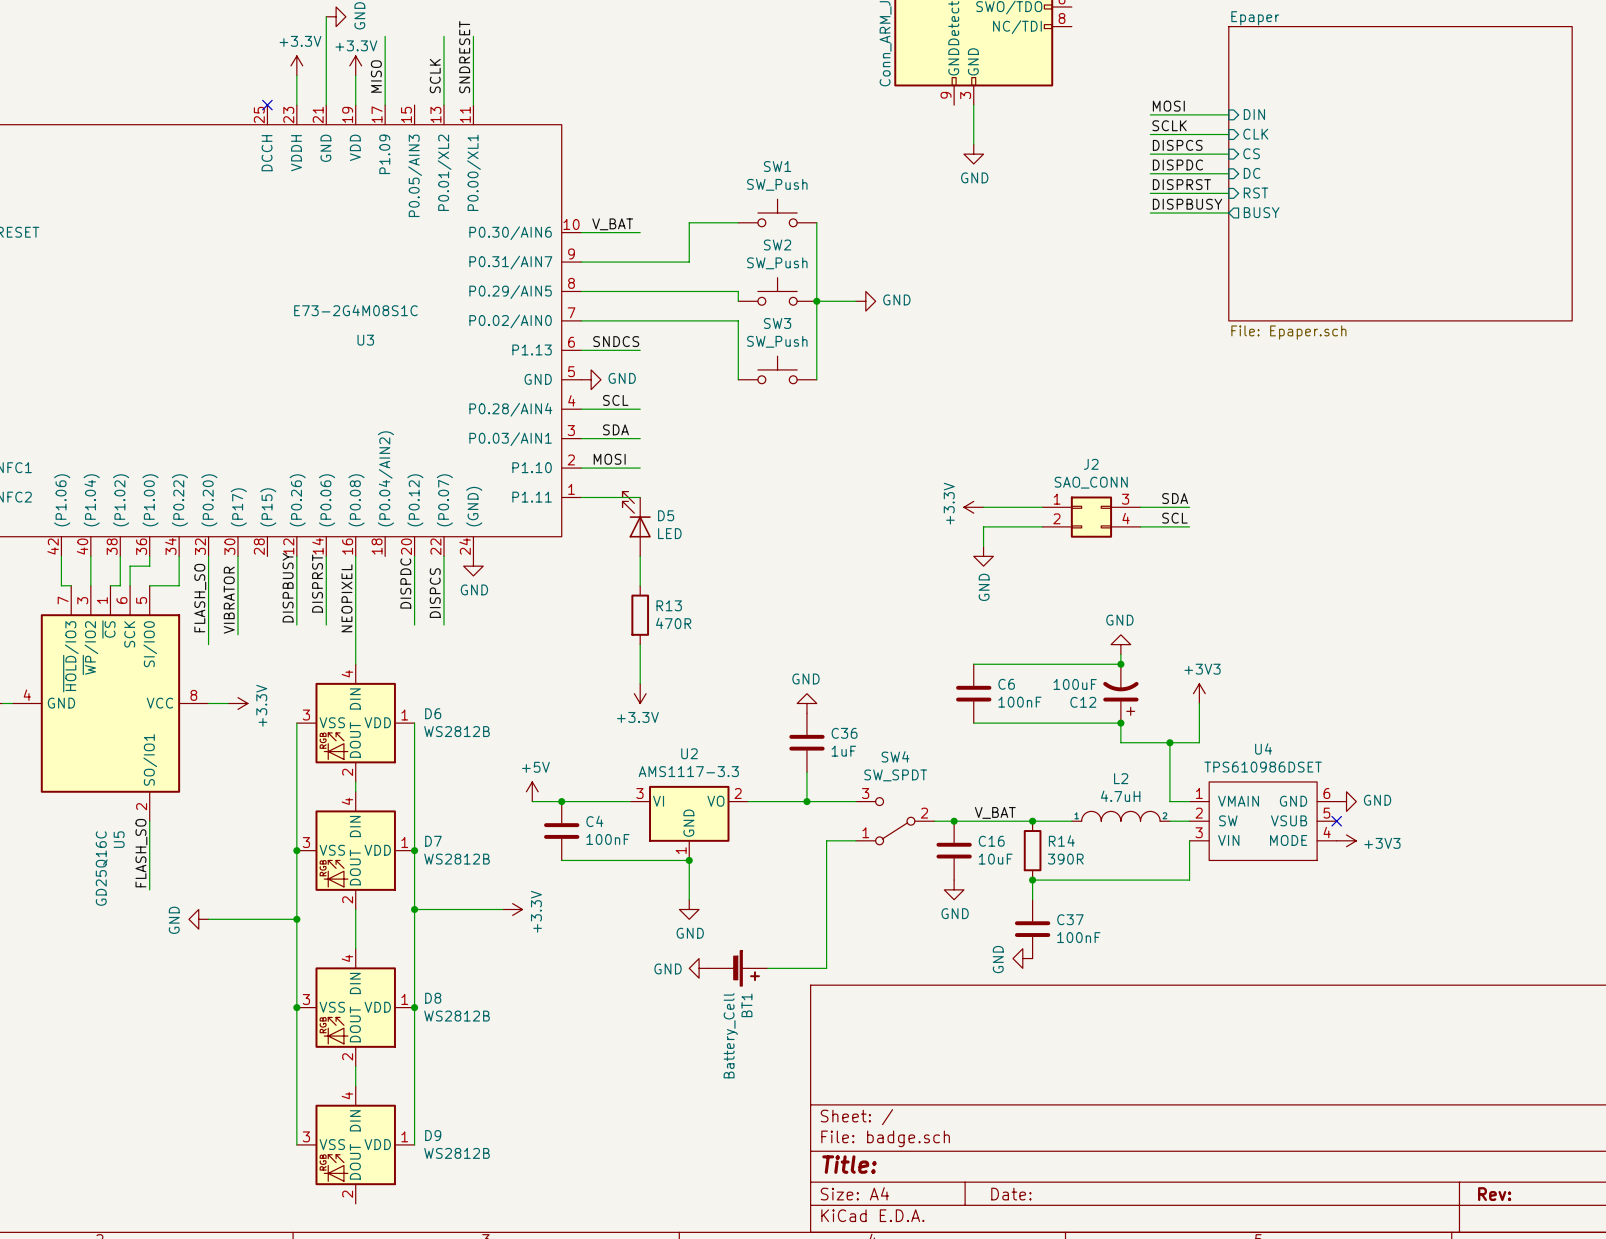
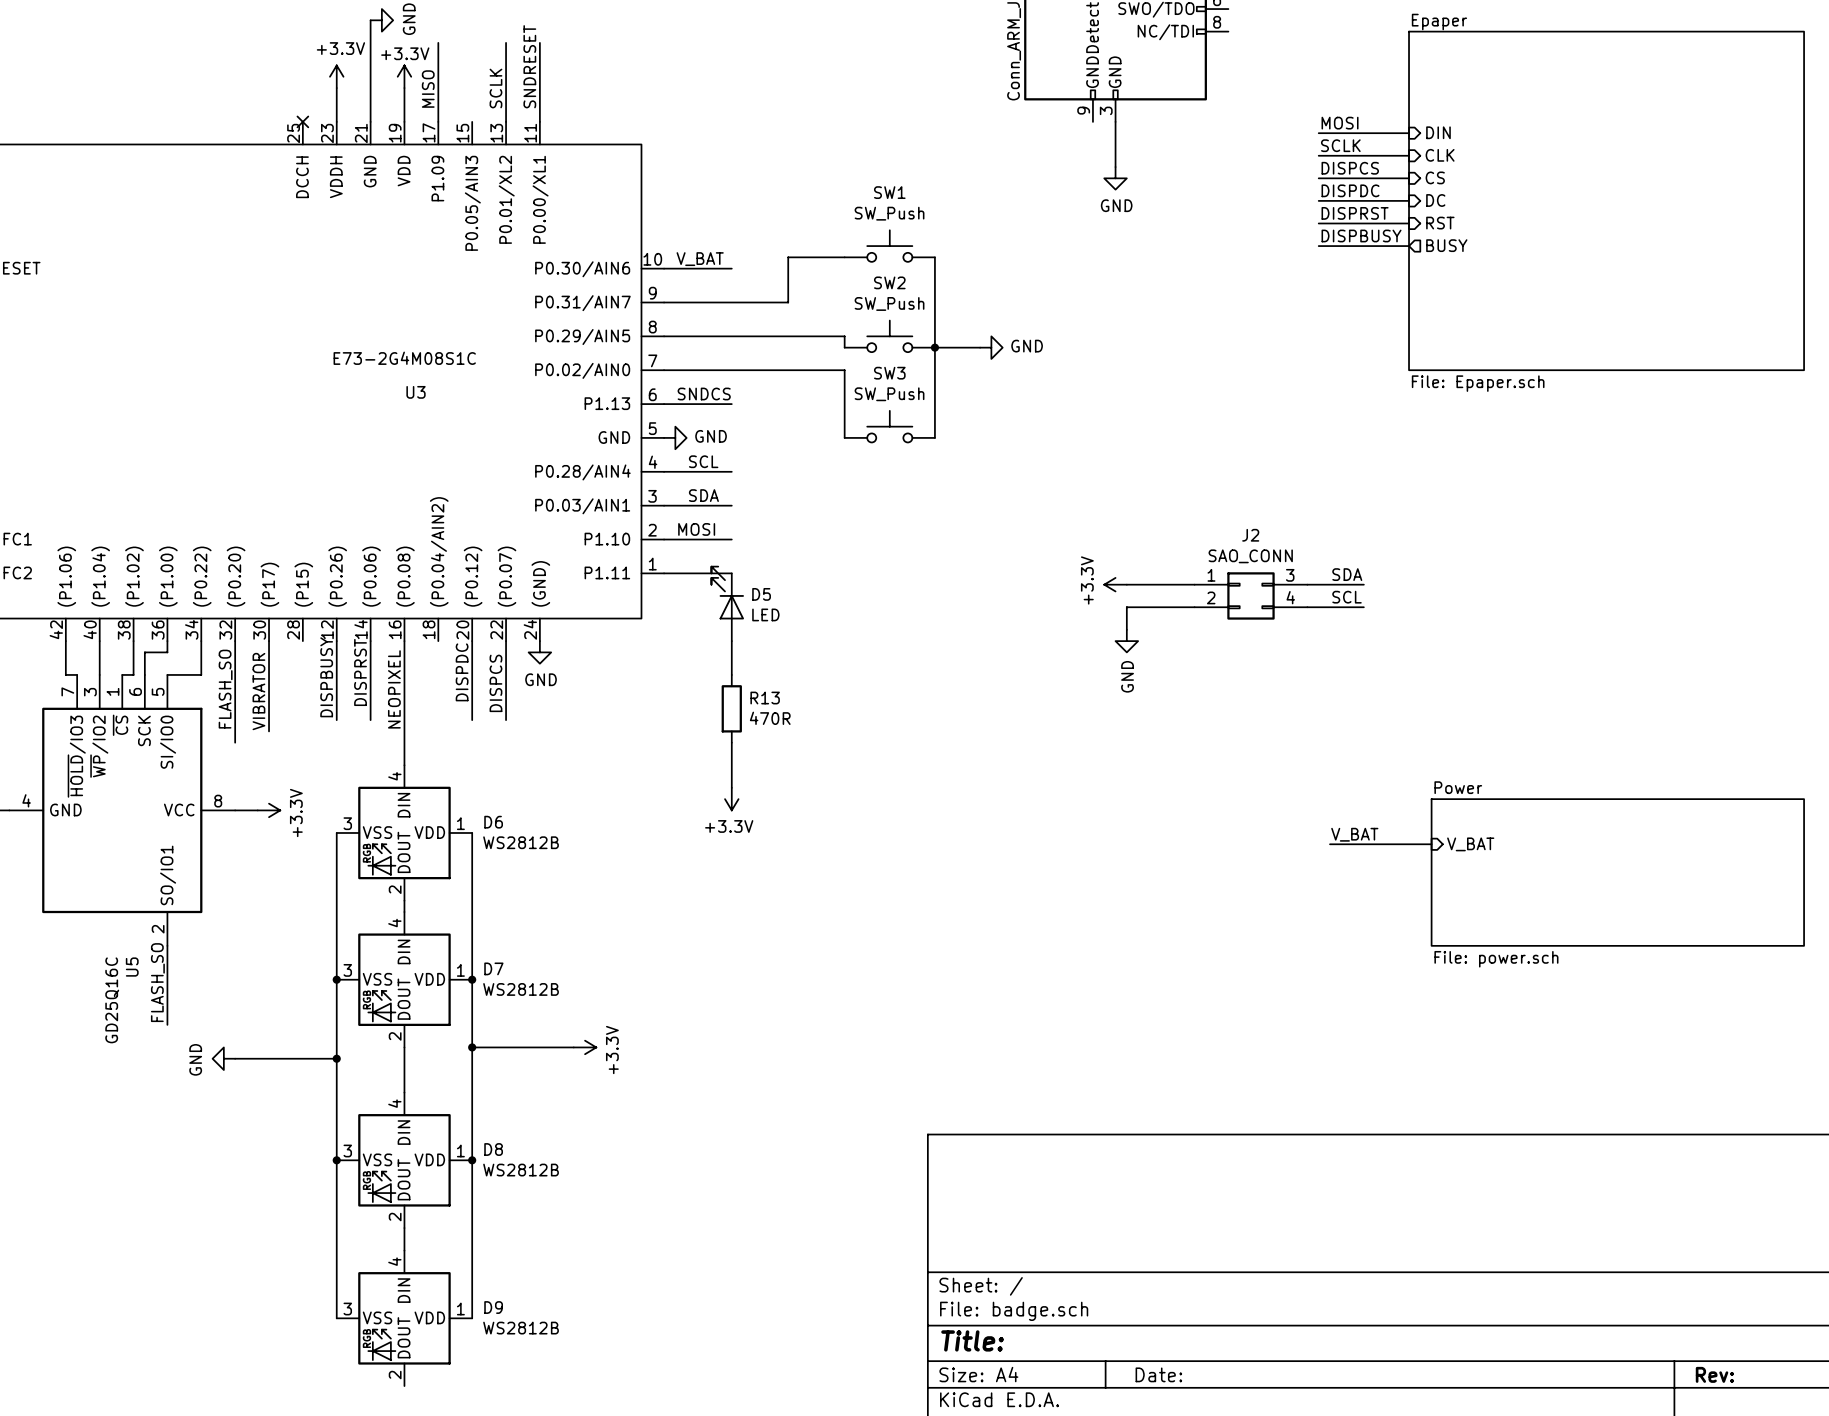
power symbol: GND (1120, 644) -> none
wire: (1120, 654) (1120, 664) (973, 664) -> none
junction: (1120, 664) -> none
C6: 100nF (973, 693) -> none
C12: 100uF (1120, 693) -> none
power symbol: +3V3 (1199, 693) -> none
power symbol: GND (806, 703) -> none
wire: (1199, 703) (1199, 742) (1120, 742) (1120, 723) (973, 723) -> none
junction: (1120, 723) -> none
label: none -> V_BAT (1354, 834)
wire: none -> (1330, 844) (1431, 844)
sheet pin: none -> V_BAT (1470, 844)
C36: 1uF (806, 742) -> none
wire: (1169, 742) (1169, 801) (1189, 801) -> none
junction: (1169, 742) -> none
sheet Power: none -> File: power.sch (1617, 872)
wire: (806, 772) (806, 801) -> none
power symbol: +5V (532, 791) -> none
wire: (532, 801) (630, 801) -> none
junction: (561, 801) -> none
wire: (748, 801) (856, 801) -> none
junction: (806, 801) -> none
power symbol: GND (1346, 801) -> none
label: V_BAT (995, 812) -> none
L2: 4.7uH (1120, 816) -> none
SW4: SW_SPDT (895, 821) -> none
wire: (934, 821) (1071, 821) -> none
junction: (954, 821) -> none
junction: (1032, 821) -> none
wire: (1169, 821) (1189, 821) -> none
U4: TPS610986DSET (1263, 821) -> none
no-connect mark: (1336, 821) -> none
U2: AMS1117-3.3 (689, 823) -> none
C4: 100nF (561, 831) -> none
wire: (856, 840) (826, 840) (826, 968) (767, 968) -> none
wire: (1189, 840) (1189, 880) (1032, 880) (1032, 899) -> none
power symbol: +3V3 (1346, 840) -> none
C16: 10uF (954, 850) -> none
R14: 390R (1032, 850) -> none
wire: (561, 860) (689, 860) (689, 899) -> none
junction: (689, 860) -> none
junction: (1032, 880) -> none
power symbol: GND (954, 889) -> none
power symbol: GND (689, 909) -> none
C37: 100nF (1032, 929) -> none
power symbol: GND (1022, 958) -> none
power symbol: GND (699, 968) -> none
BT1: Battery_Cell (738, 968) -> none

